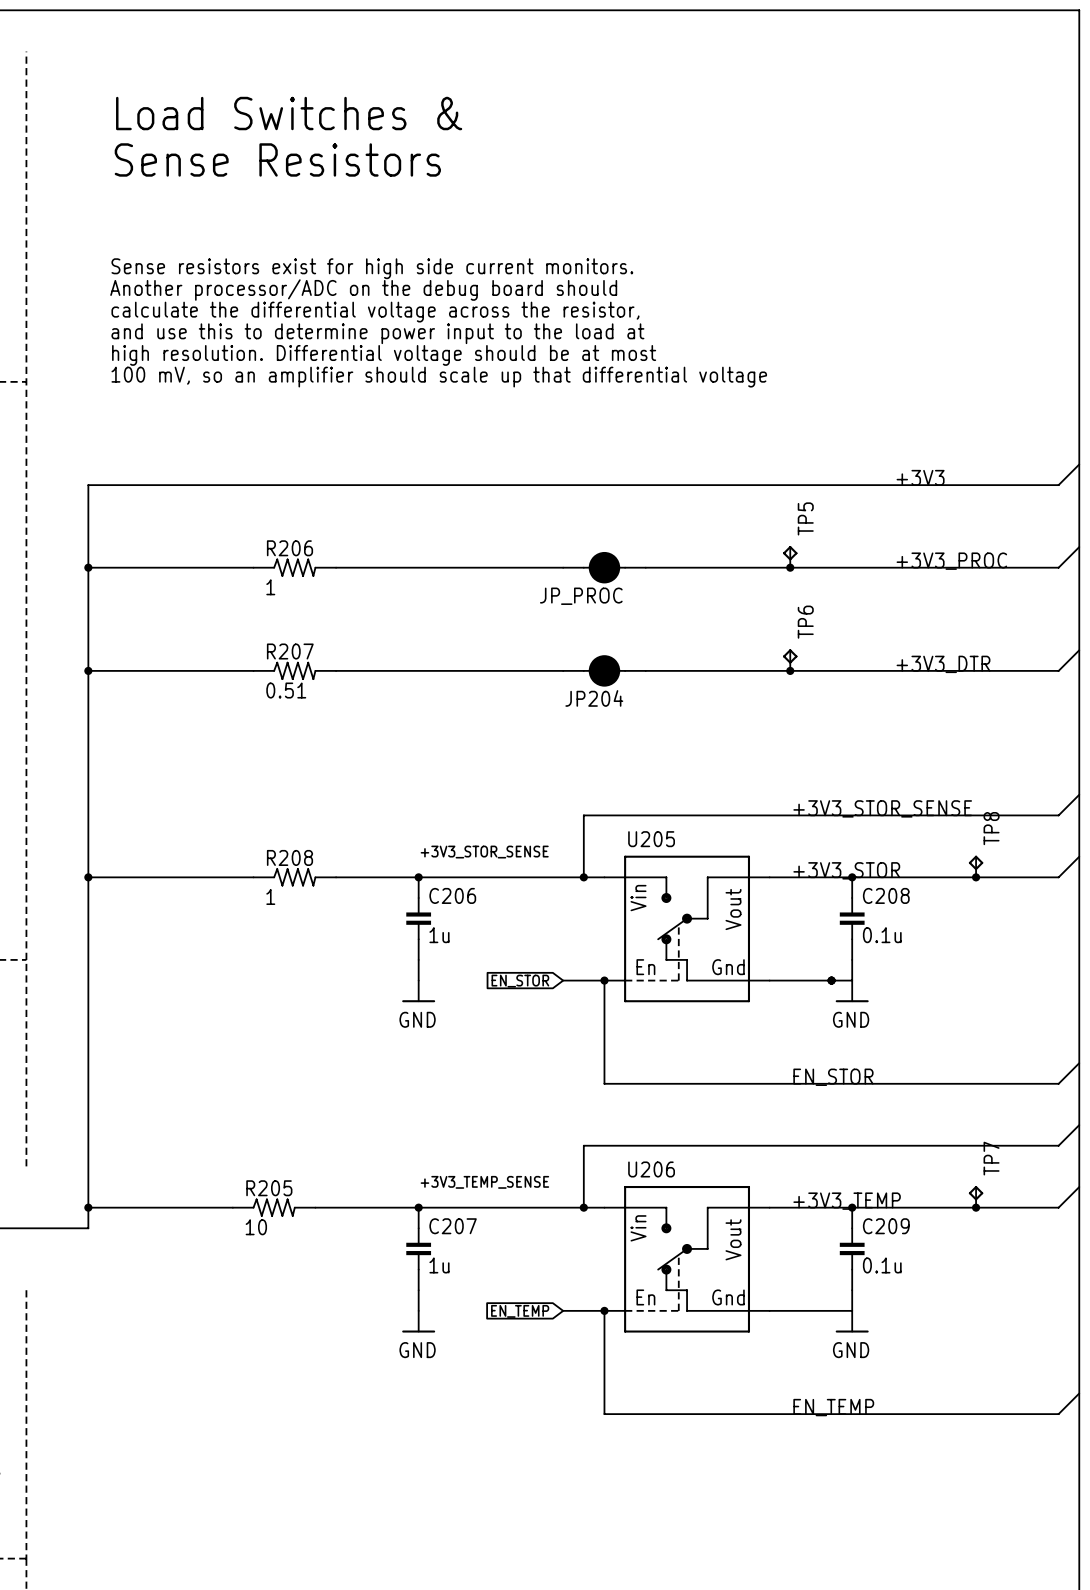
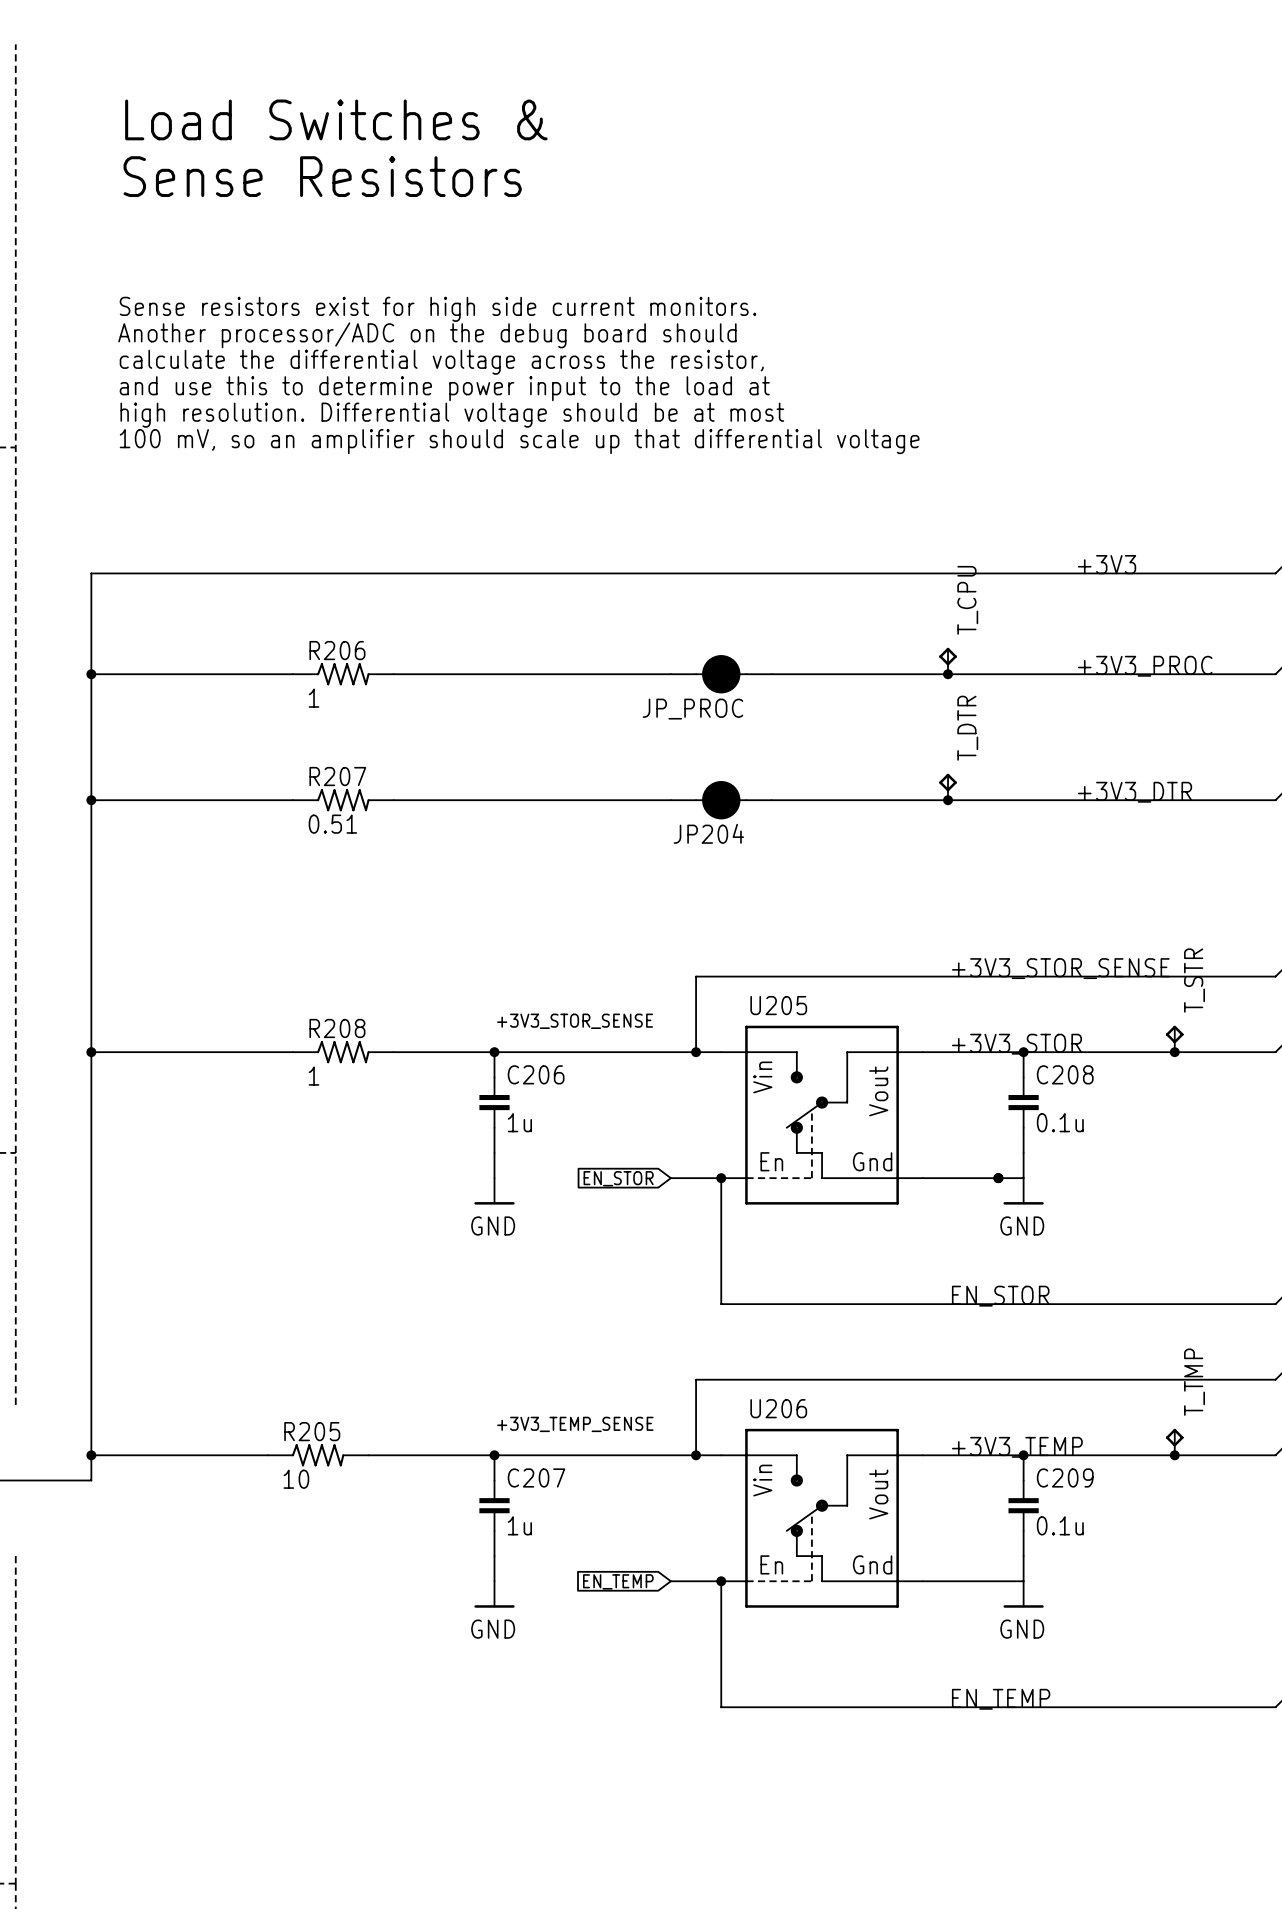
TP5 name: TP5 (805, 518) -> T_CPU (967, 600)
TP6 name: TP6 (805, 622) -> T_DTR (967, 728)
TP8 name: TP8 (991, 828) -> T_STR (1194, 980)
TP7 name: TP7 (991, 1158) -> T_TMP (1194, 1382)

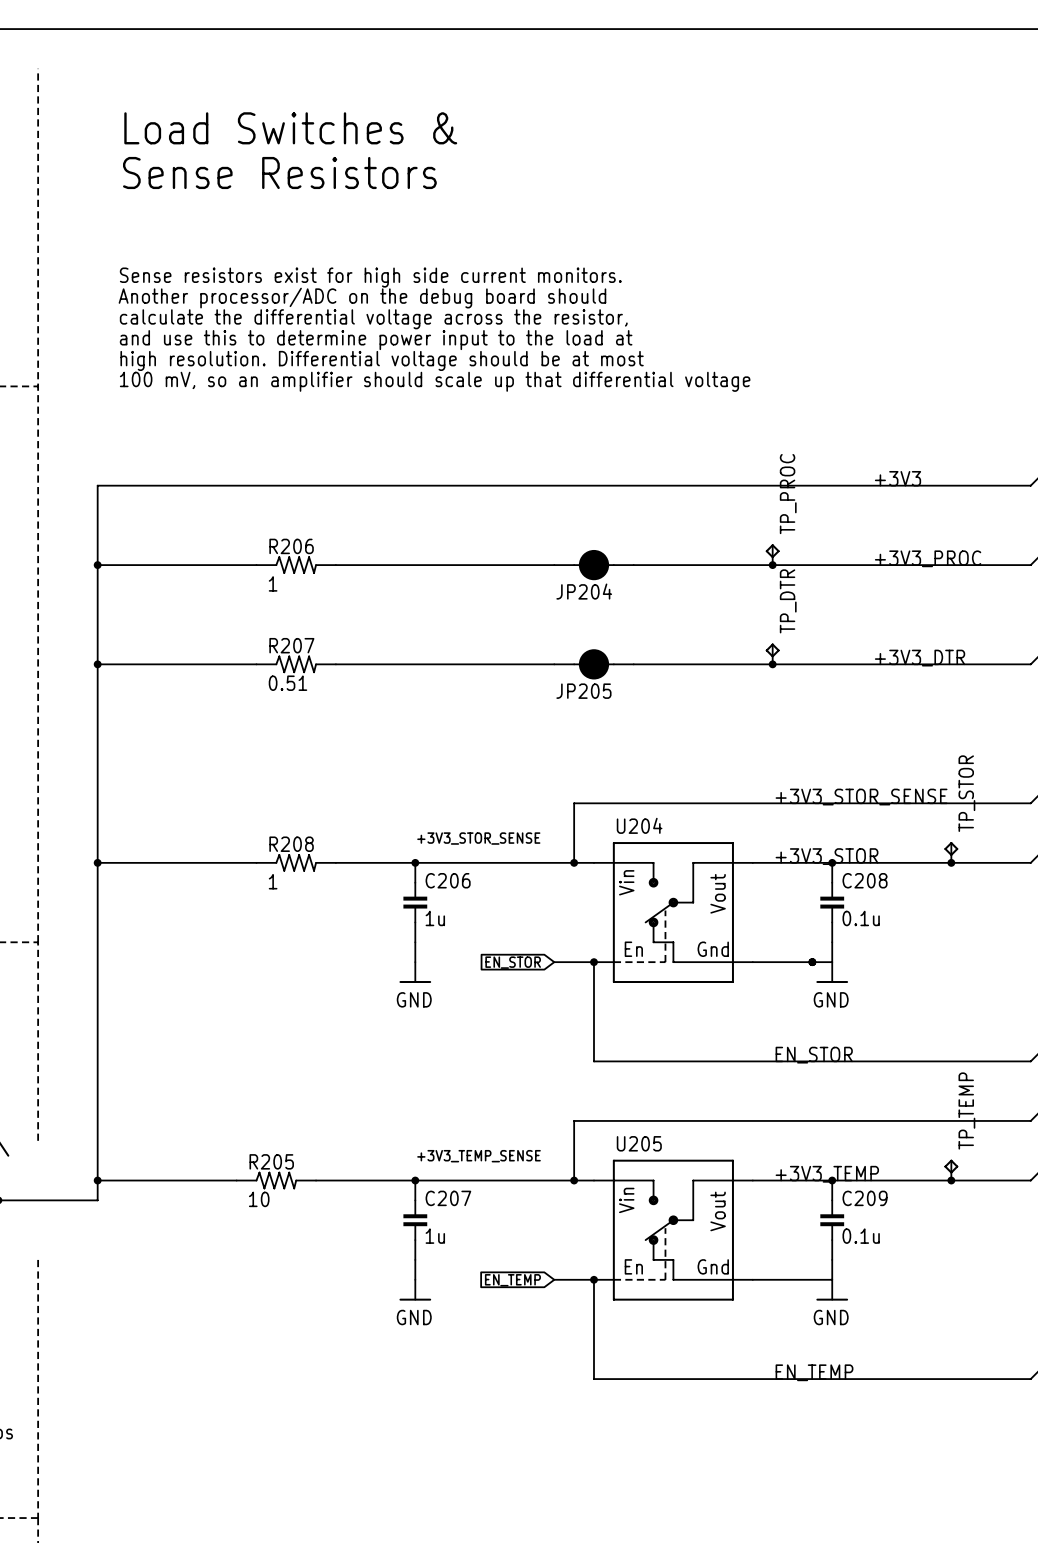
T_CPU name: T_CPU (967, 600) -> TP_PROC (788, 494)
JP_PROC name: JP_PROC (692, 709) -> JP204 (584, 591)
T_DTR name: T_DTR (967, 728) -> TP_DTR (788, 601)
JP204 name: JP204 (708, 833) -> JP205 (583, 691)
T_STR name: T_STR (1194, 980) -> TP_STOR (966, 793)
U205 name: U205 (778, 1005) -> U204 (639, 825)
T_TMP name: T_TMP (1194, 1382) -> TP_TEMP (966, 1111)
U206 name: U206 (778, 1408) -> U205 (639, 1143)

